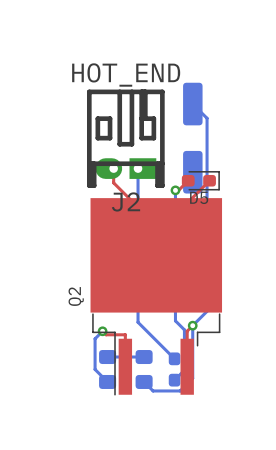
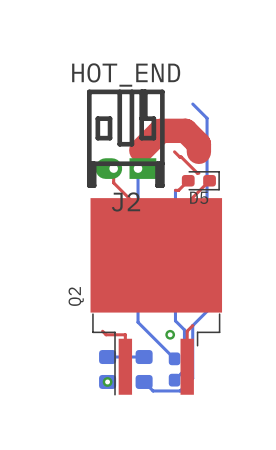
part: (192, 138) -> none
top track: none -> (141, 150) (160, 130) (185, 130) (198, 144) (198, 151)
top track: none -> (174, 151) (198, 173)
via: (175, 190) -> none
via position: (192, 325) -> (170, 334)
bottom track: (102, 331) (95, 338) (95, 369) (107, 381) -> none
via: (102, 331) -> none
via: none -> (107, 381)

